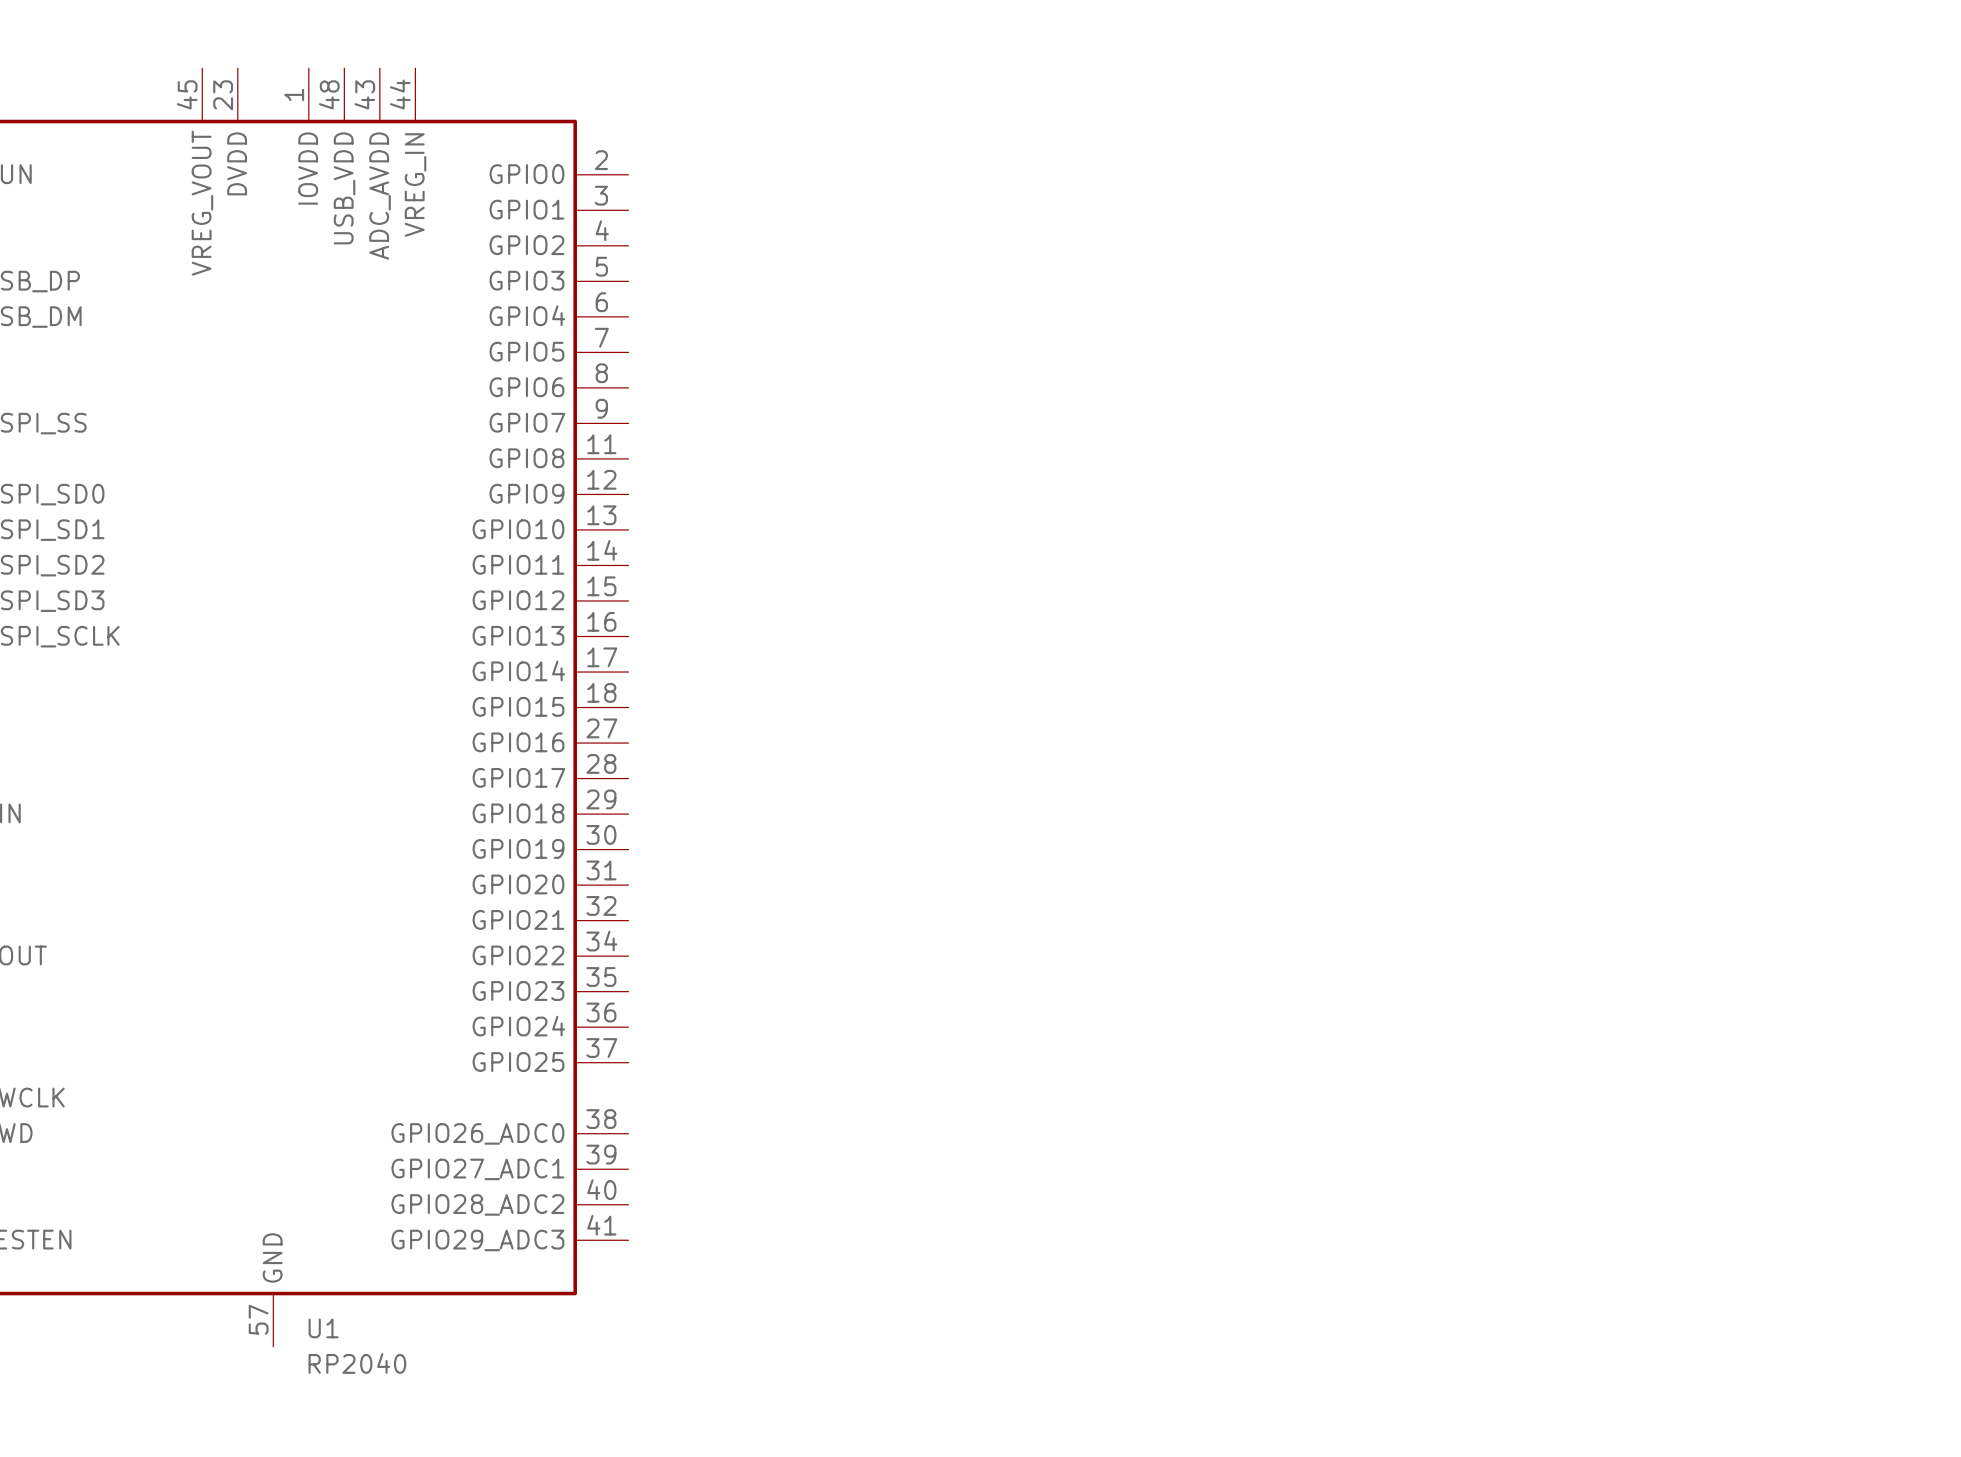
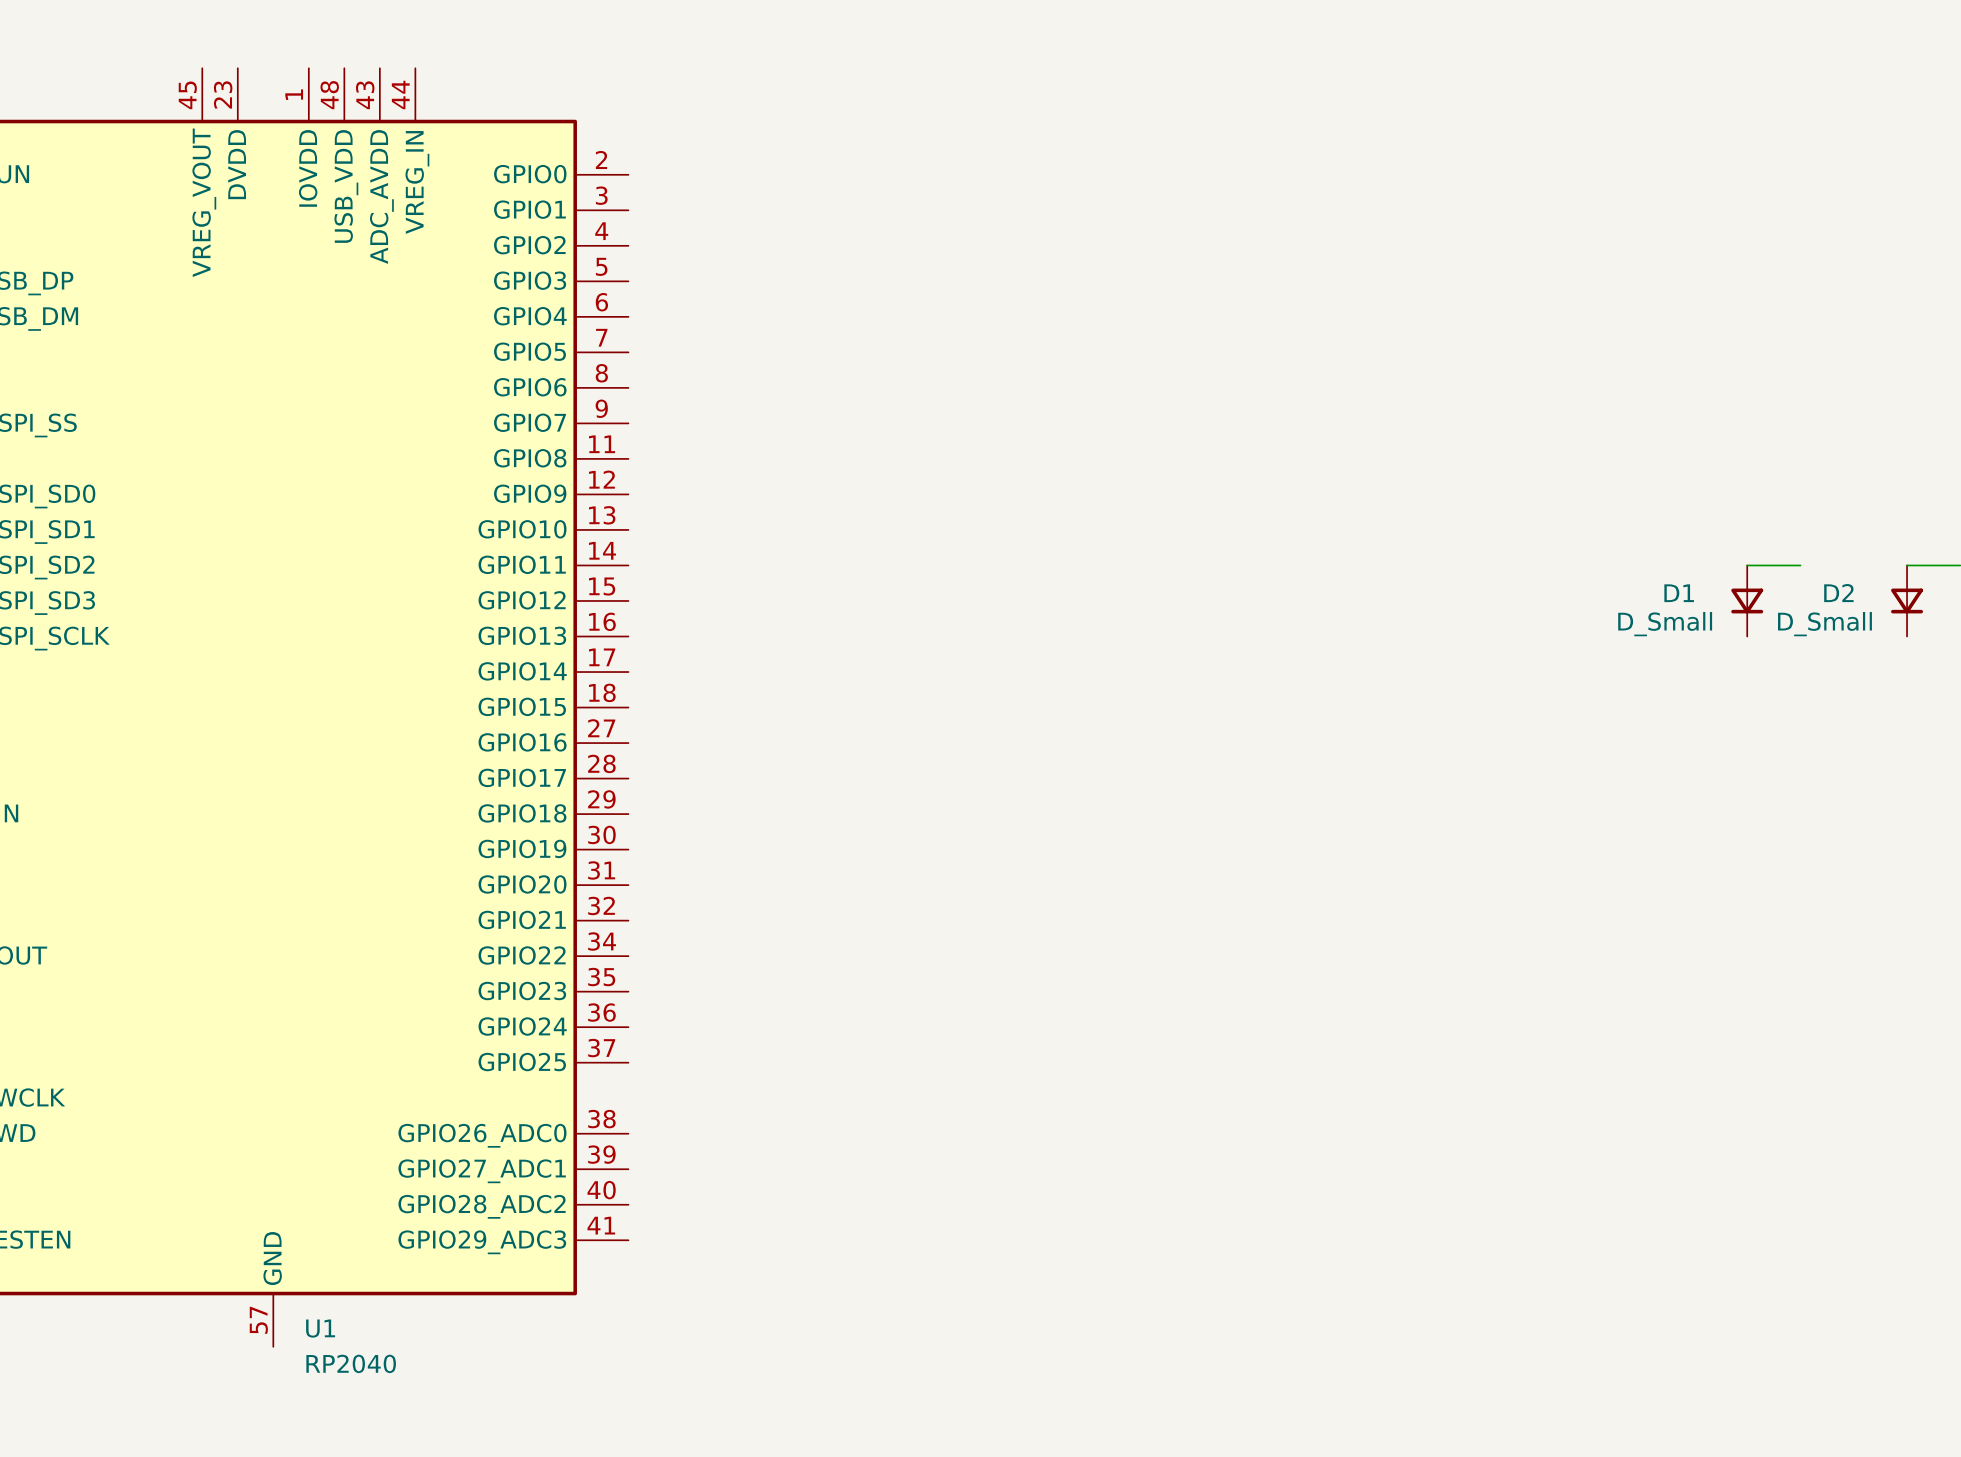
wire: none -> (1747, 565) (1800, 565)
wire: none -> (1907, 565) (1960, 565)
D1: none -> D_Small (1747, 600)
D2: none -> D_Small (1907, 600)

